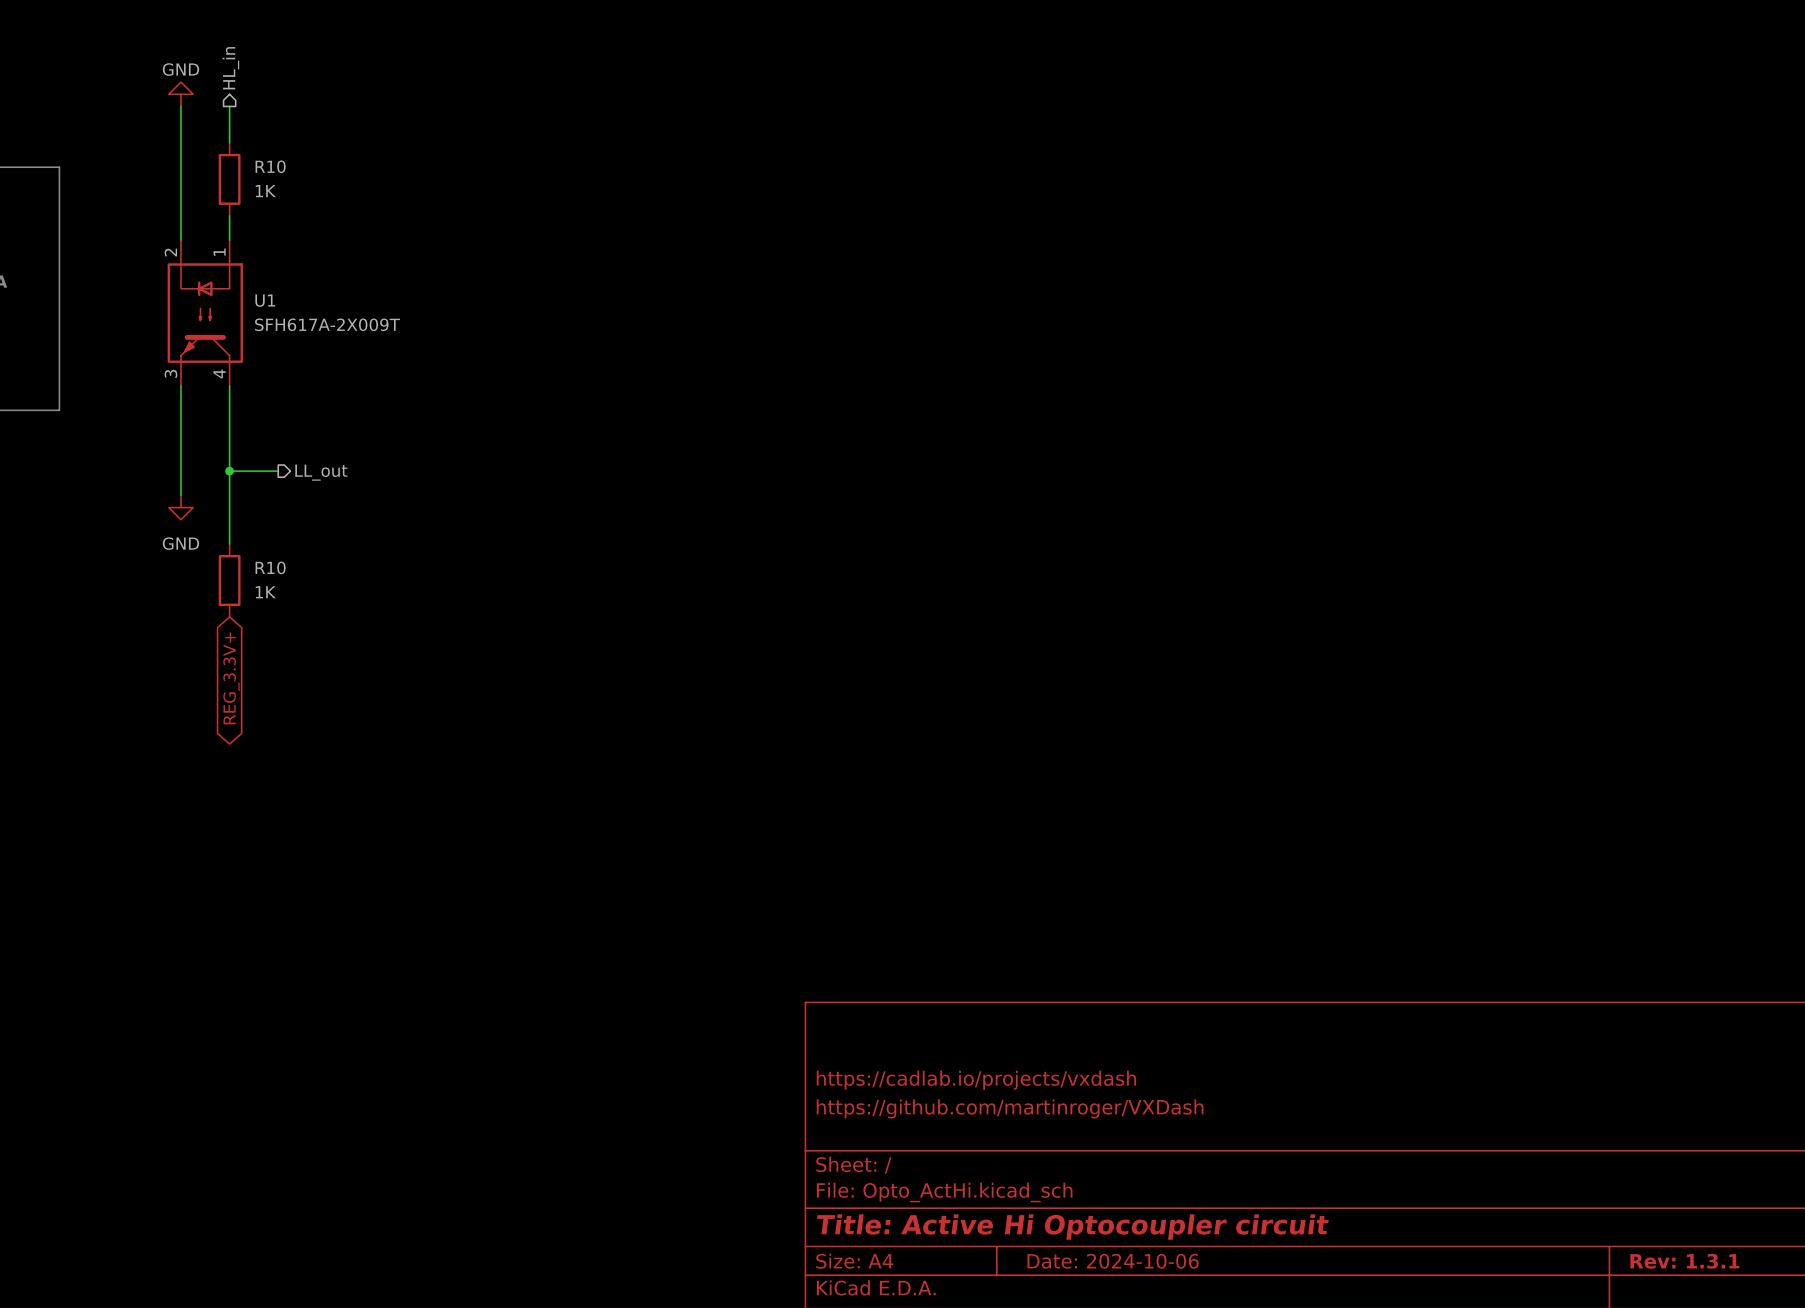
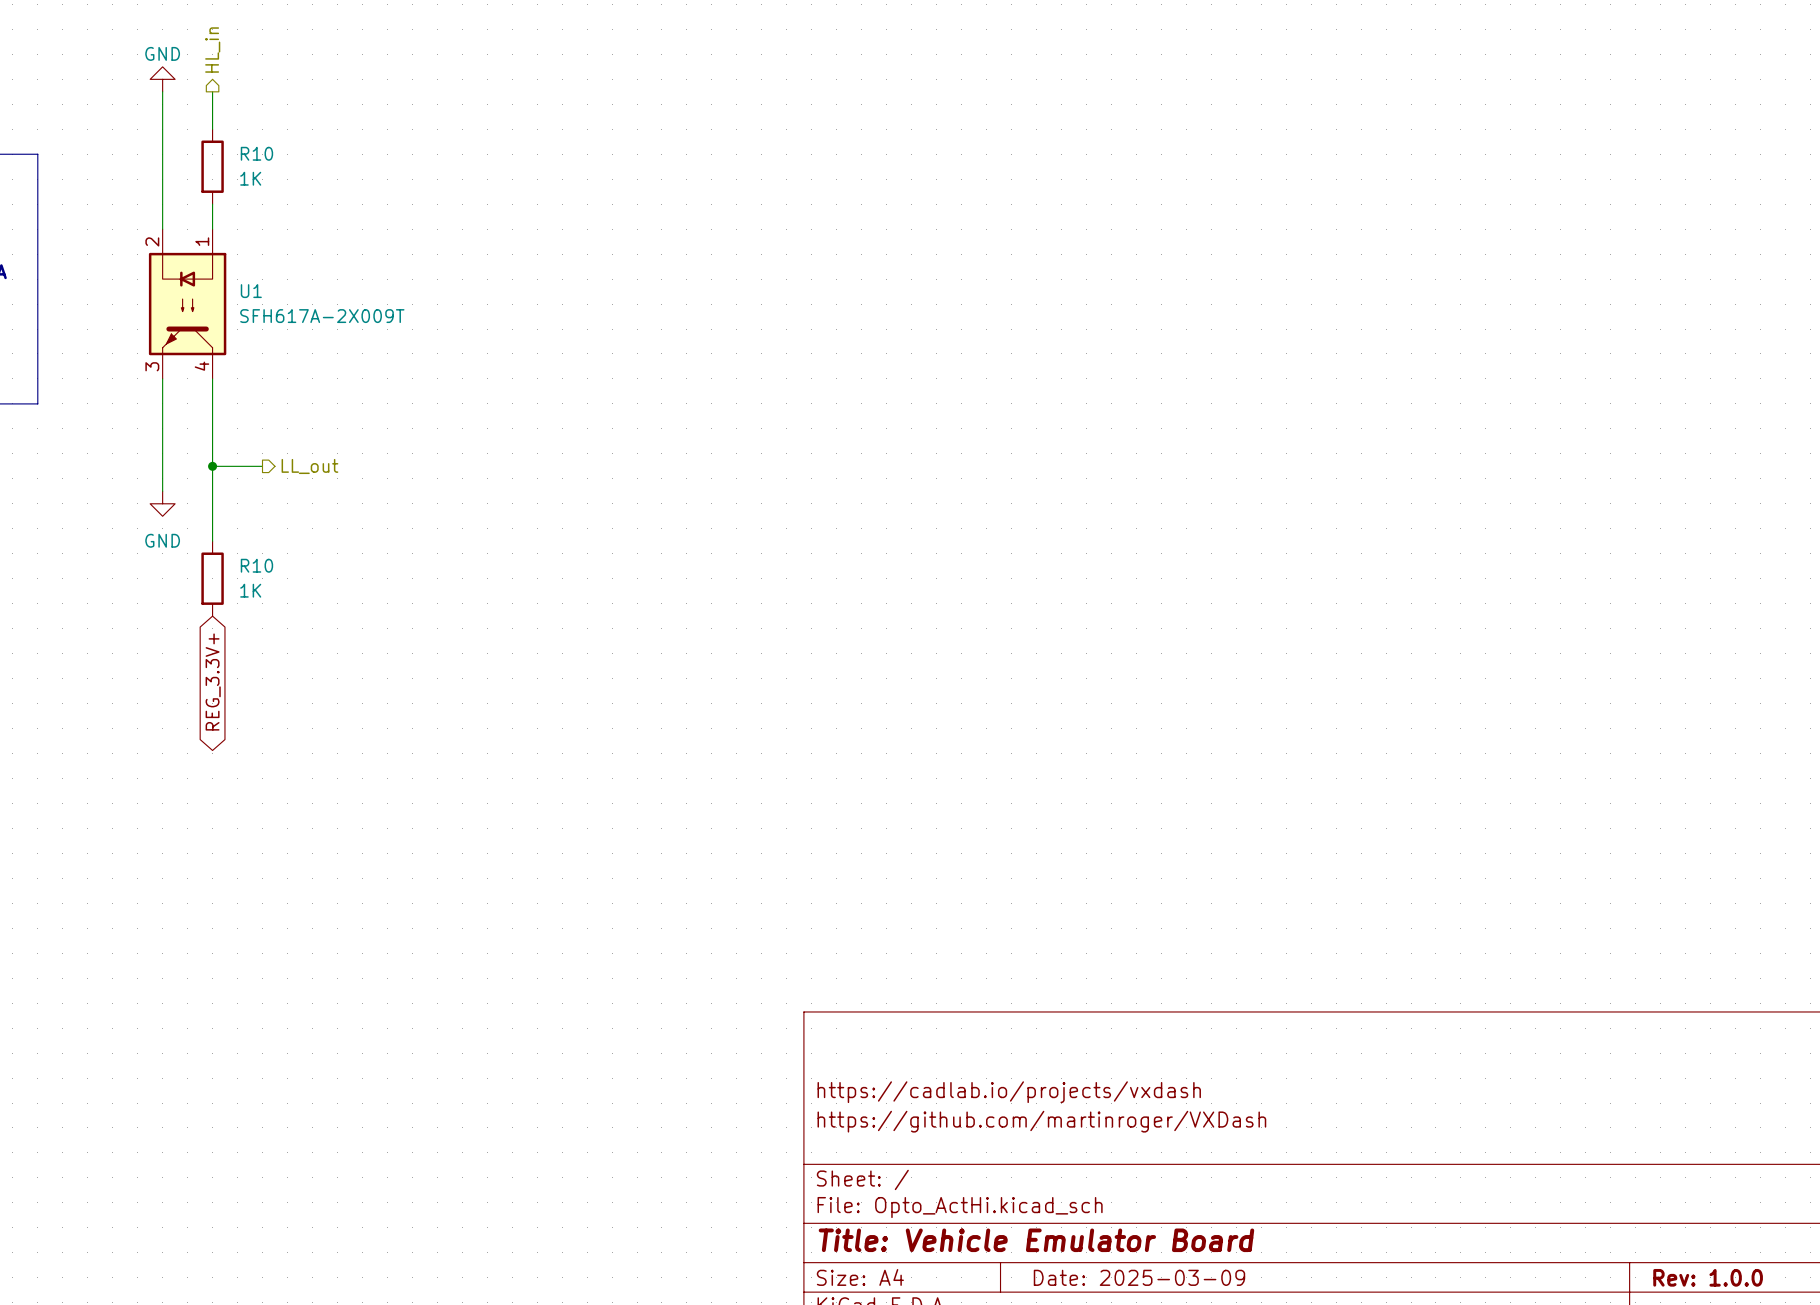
title block: Title: Active Hi Optocoupler circuit (1072, 1227) -> Title: Vehicle Emulator Board (1036, 1240)
title block: Date: 2024-10-06 (1113, 1261) -> Date: 2025-03-09 (1139, 1277)
title block: Rev: 1.3.1 (1684, 1261) -> Rev: 1.0.0 (1708, 1277)

